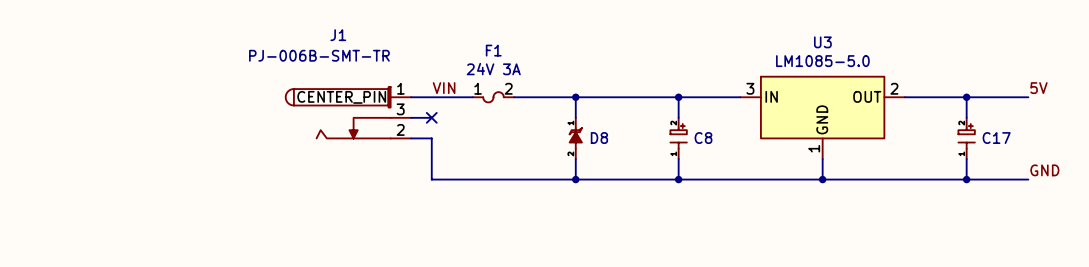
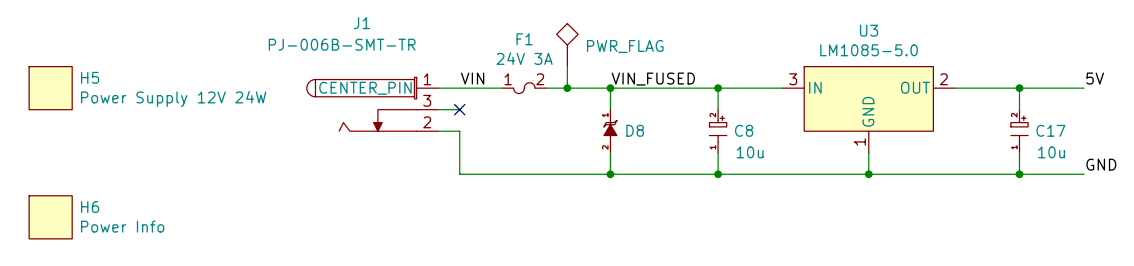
power symbol: none -> PWR_FLAG (567, 45)
wire: none -> (567, 66) (567, 88)
label: none -> VIN_FUSED (653, 79)
H5: none -> Power Supply 12V 24W (50, 88)
junction: none -> (567, 88)
C8 value: none -> 10u (750, 152)
C17 value: none -> 10u (1051, 152)
H6: none -> Power Info (50, 217)

